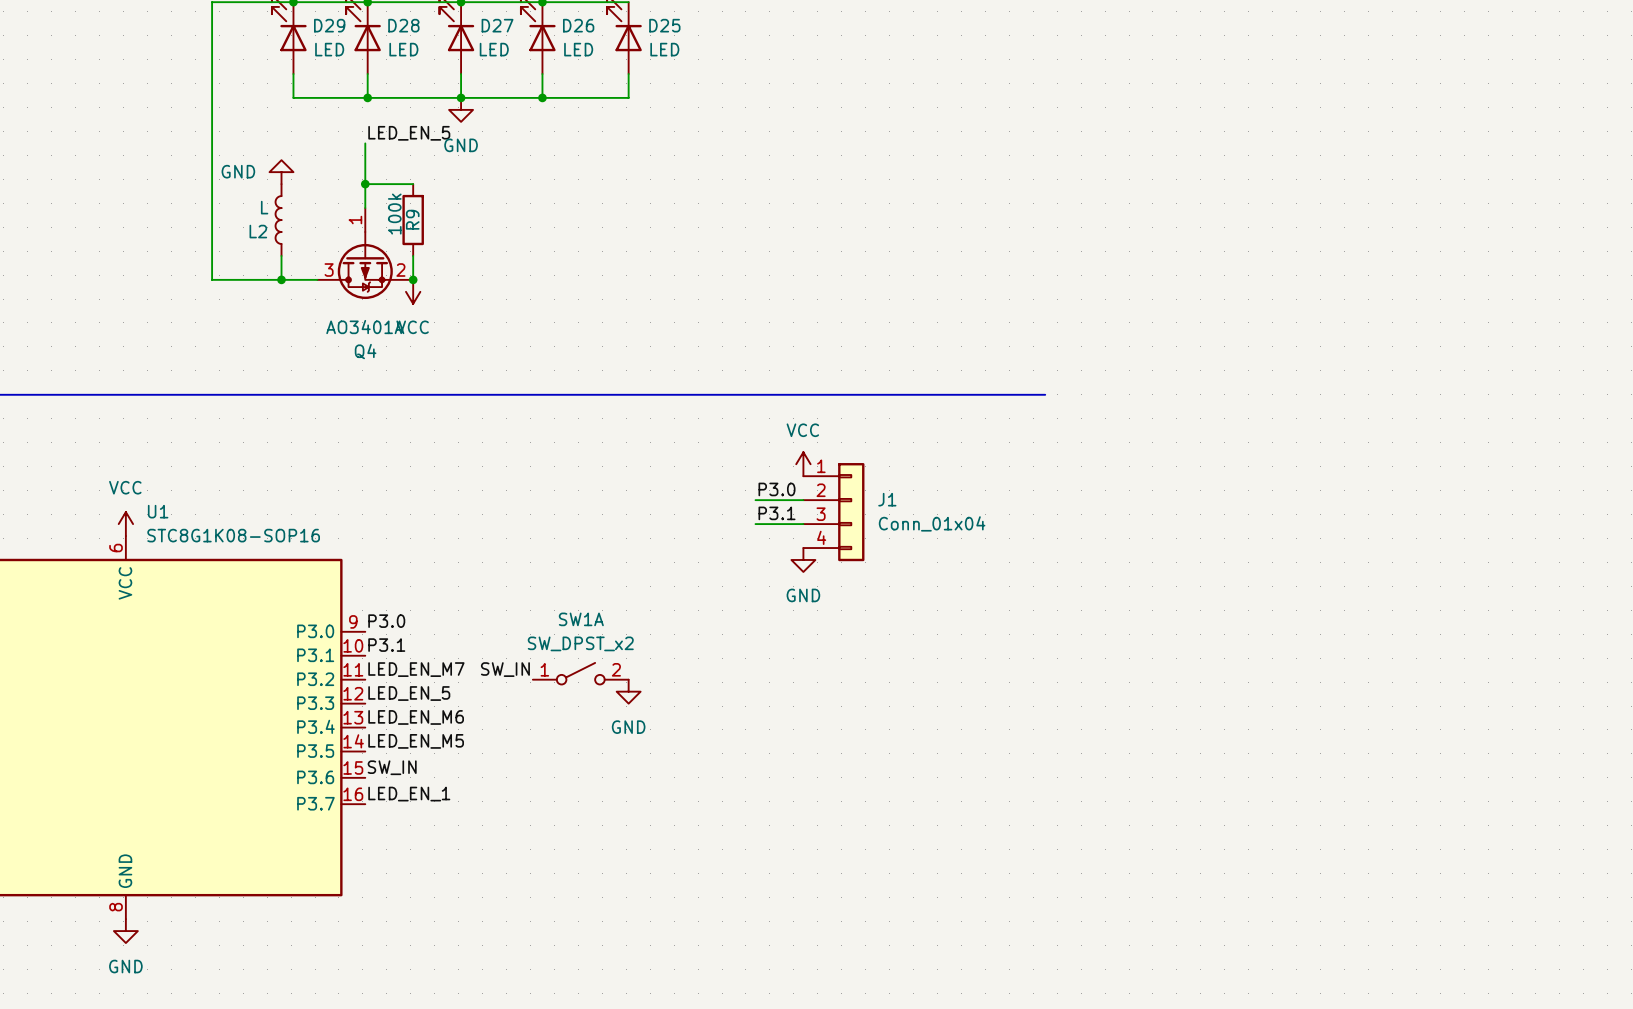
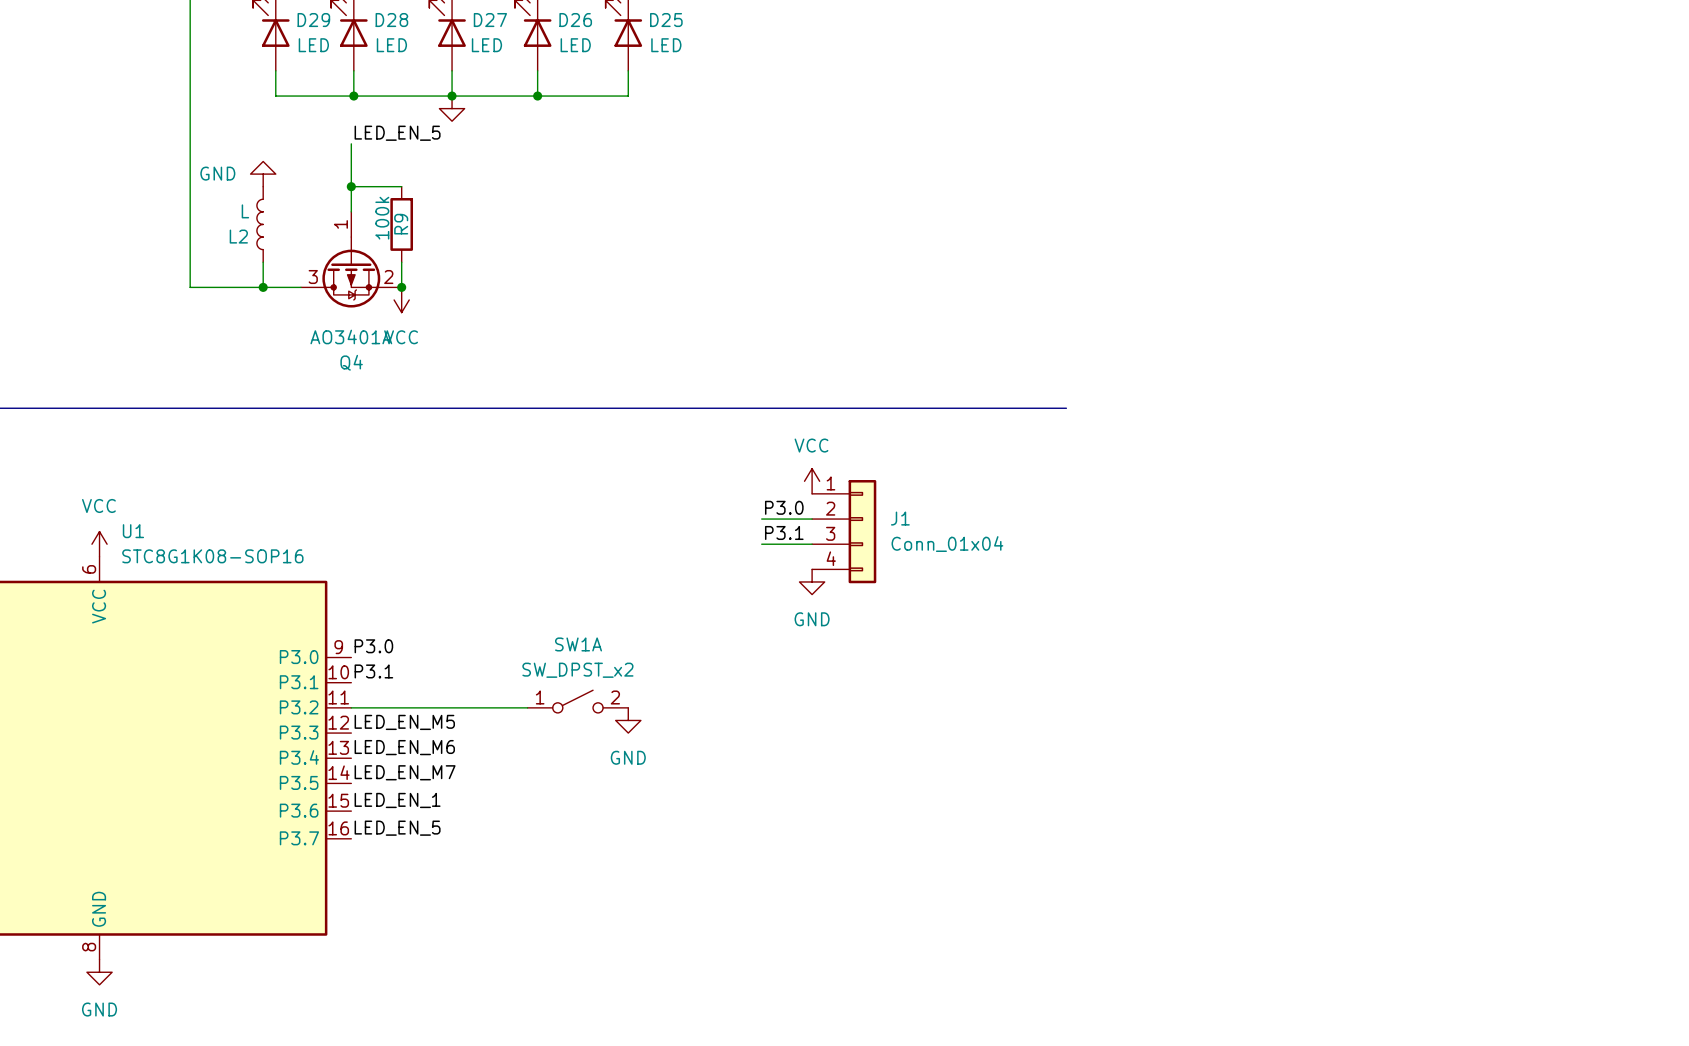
power symbol text: GND (461, 145) -> none
label: LED_EN_M7 (416, 669) -> none
label: SW_IN (505, 669) -> none
wire: none -> (351, 707) (527, 707)
label: LED_EN_5 (409, 693) -> LED_EN_M5 (404, 722)
label: LED_EN_M5 (416, 741) -> LED_EN_M7 (405, 772)
label: SW_IN (392, 767) -> LED_EN_1 (397, 800)
label: LED_EN_1 (409, 794) -> LED_EN_5 (397, 828)

